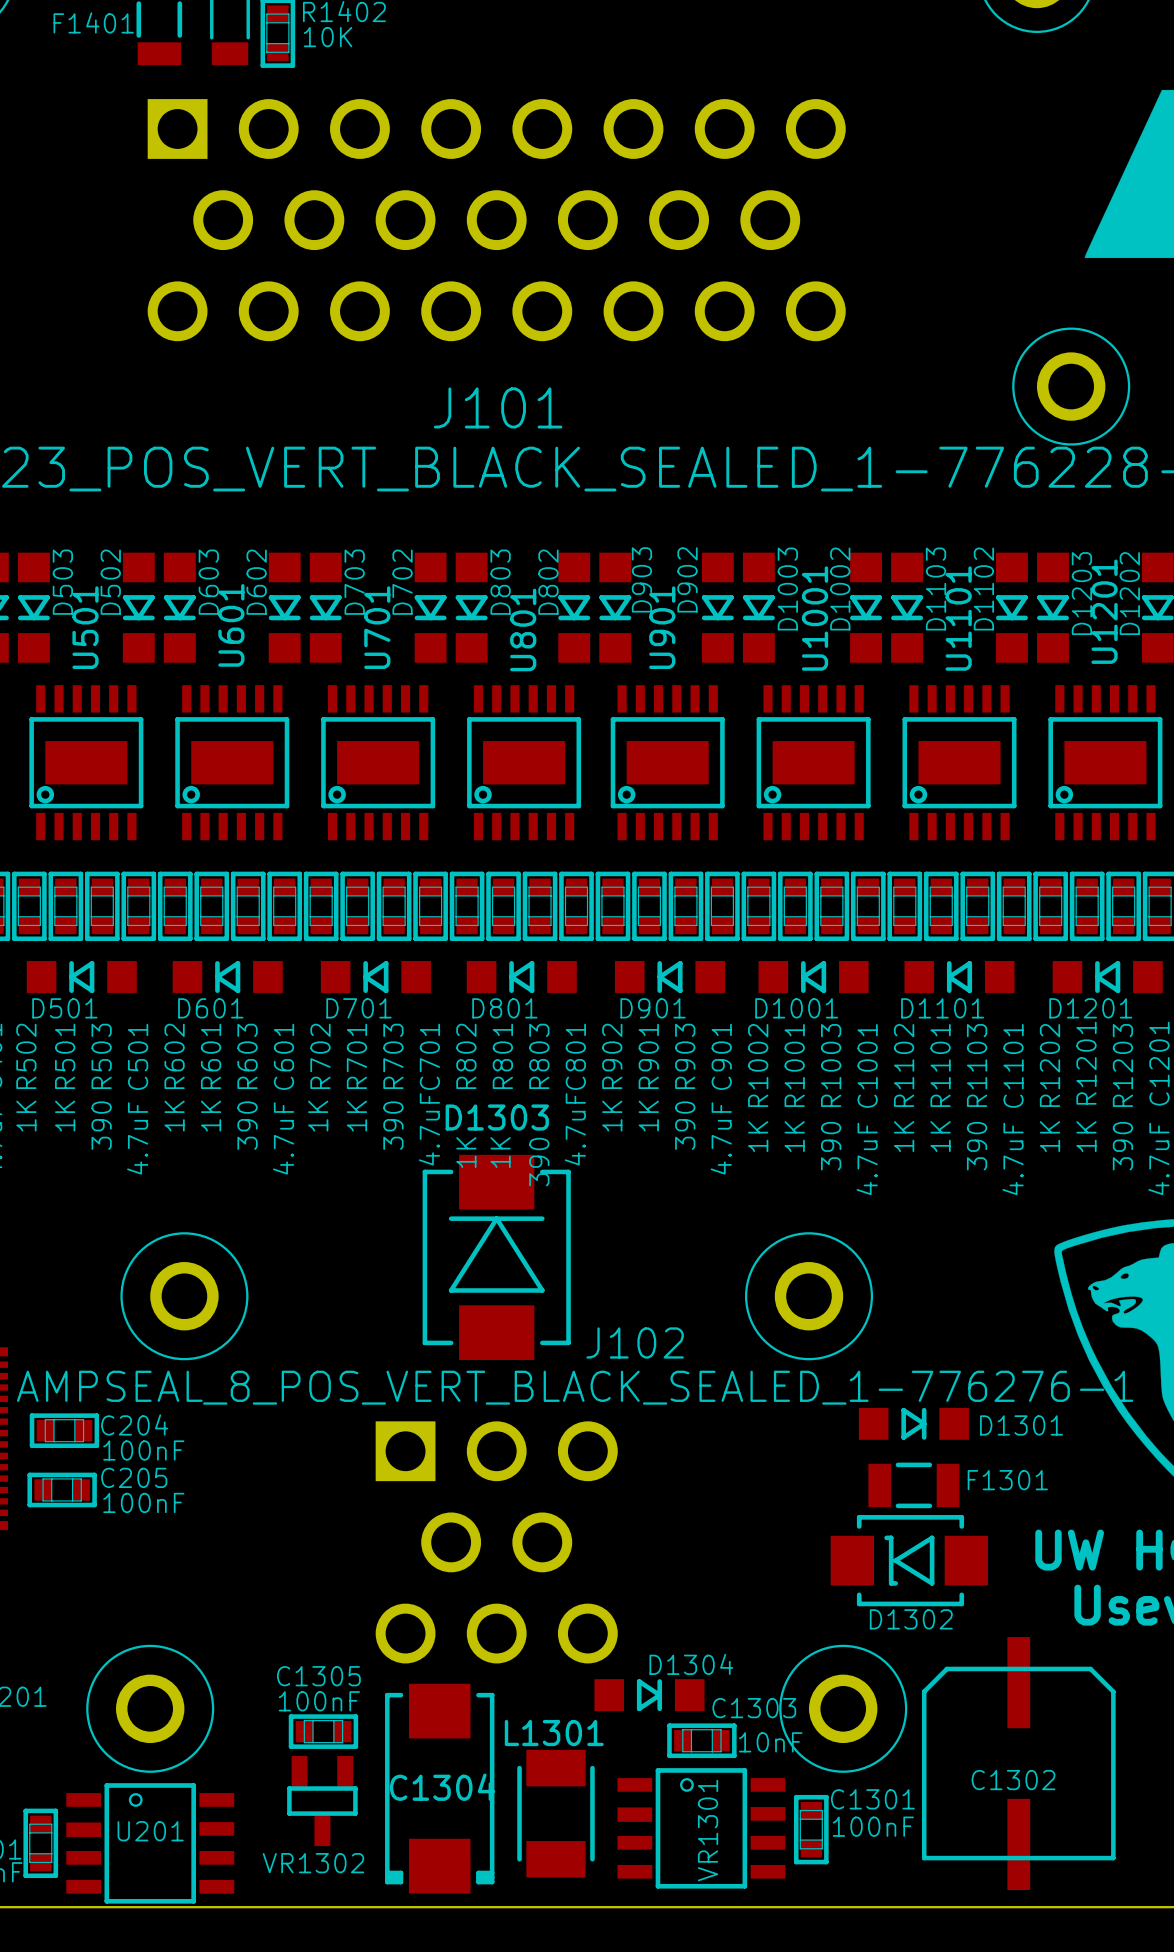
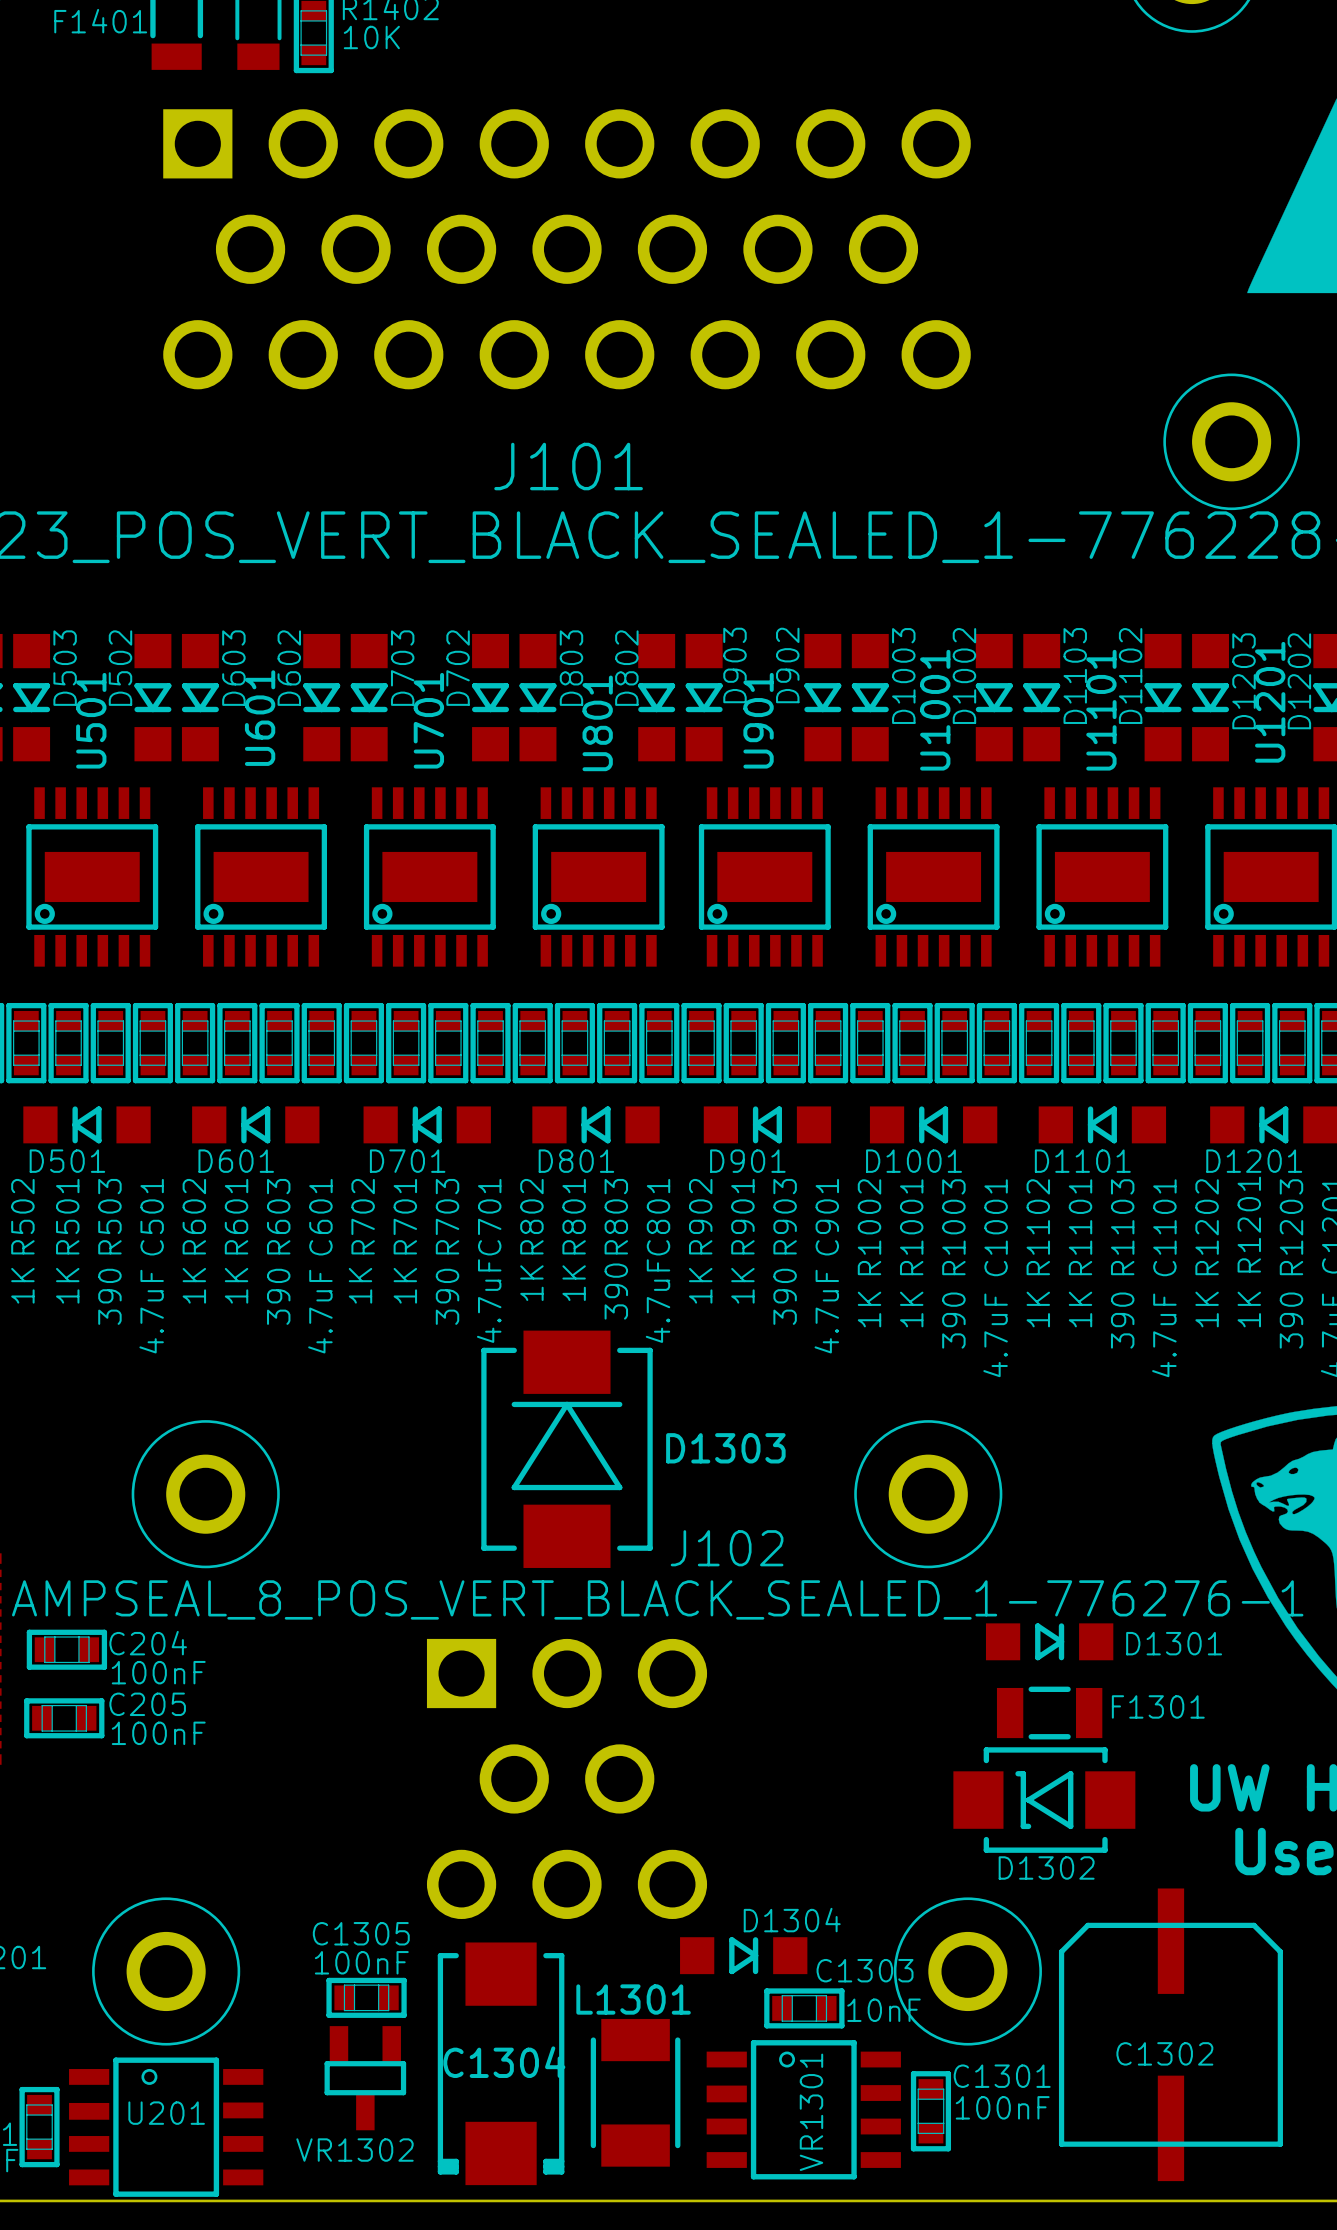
D1303 name position: D1303 (497, 1117) -> D1303 (725, 1448)
R802 value position: 1K (466, 1152) -> 1K (531, 1283)
R801 value position: 1K (500, 1152) -> 1K (574, 1283)
R803 value position: 390 (539, 1162) -> 390 (616, 1291)

